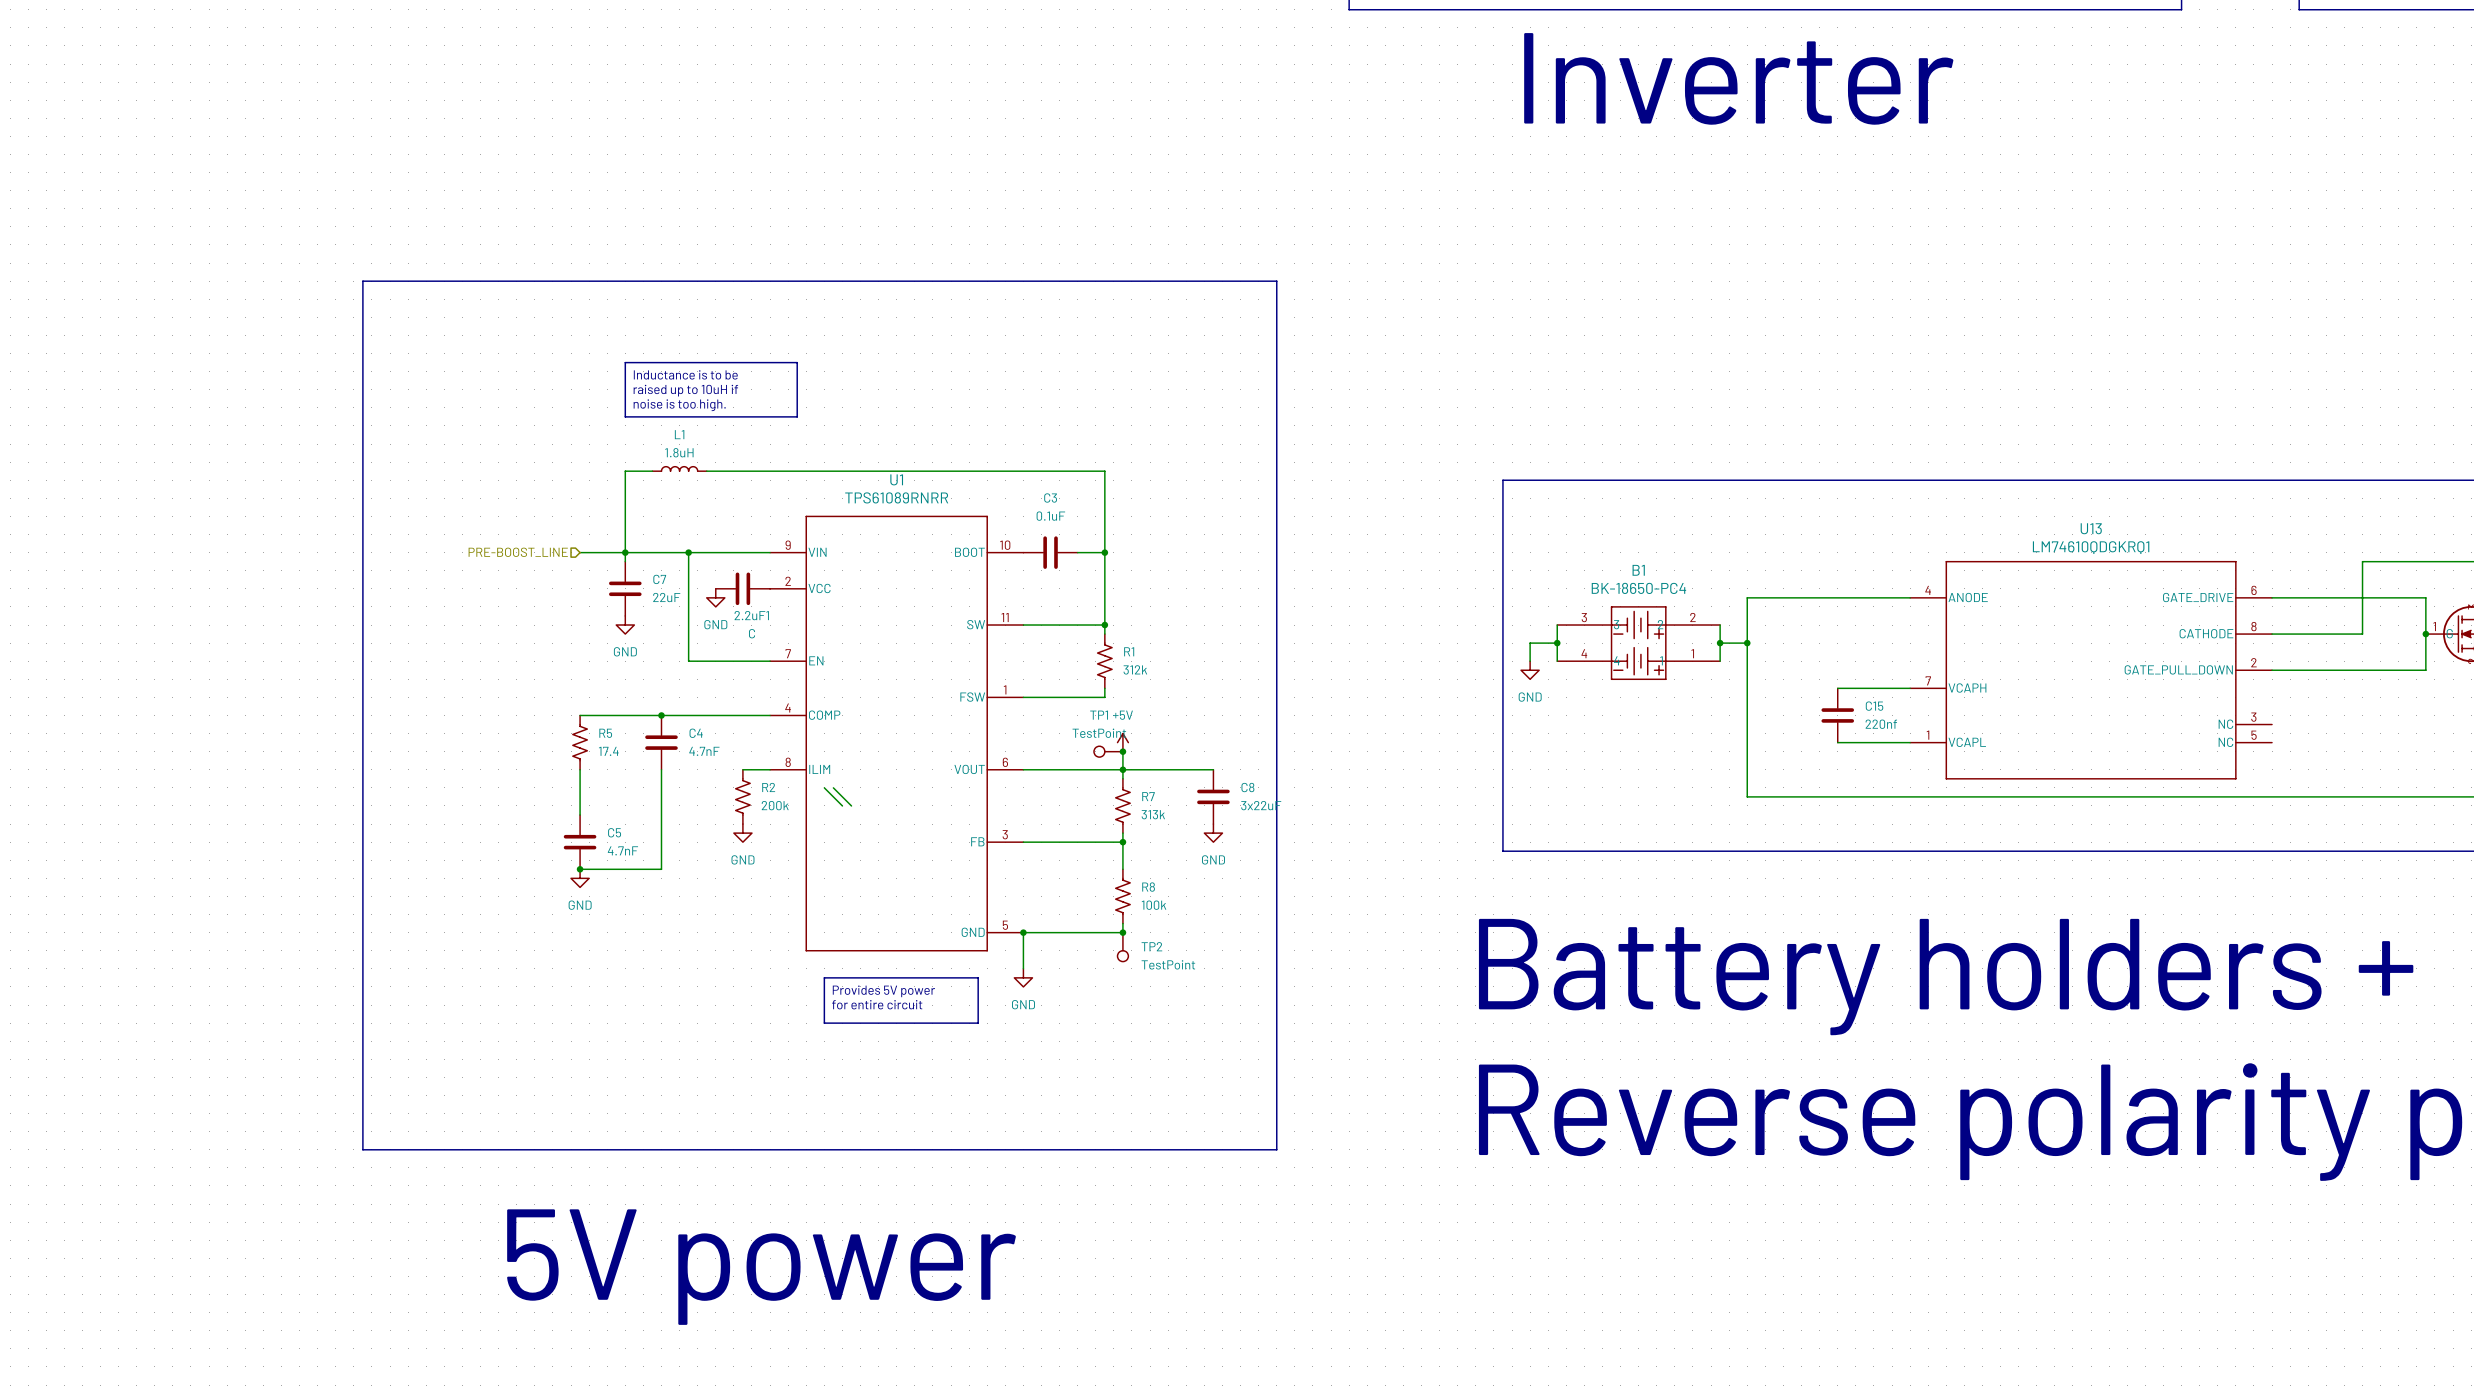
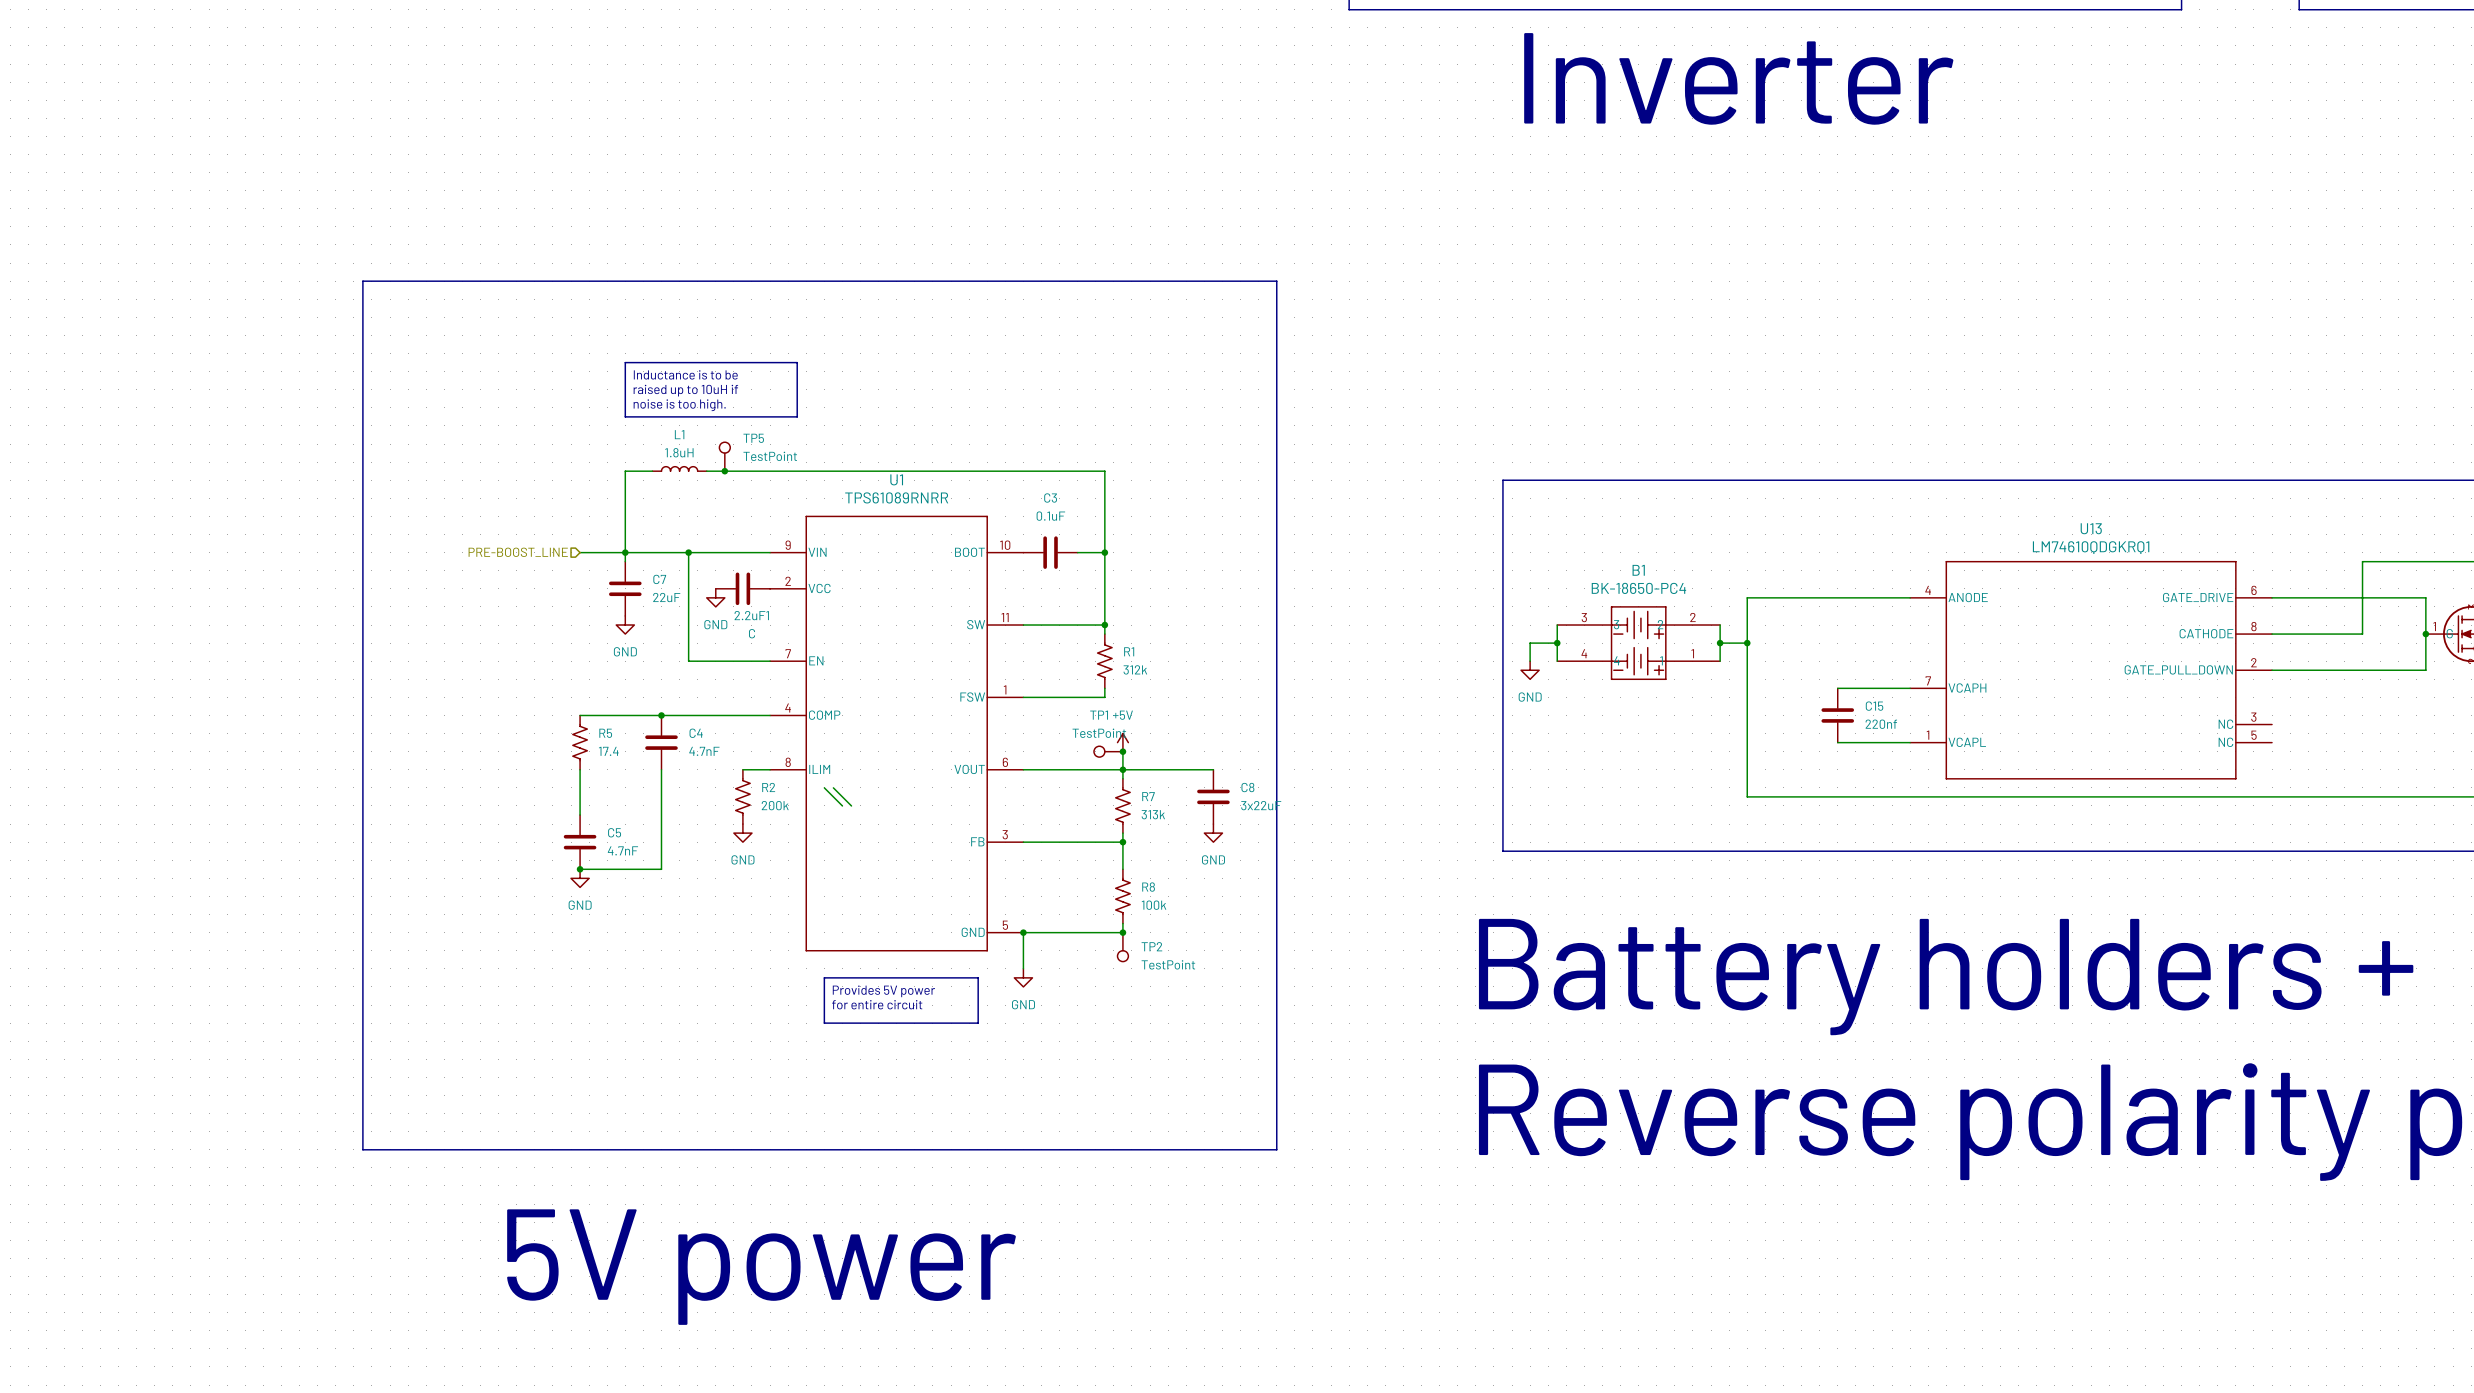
TP5: none -> TestPoint (724, 456)
junction: none -> (724, 471)

